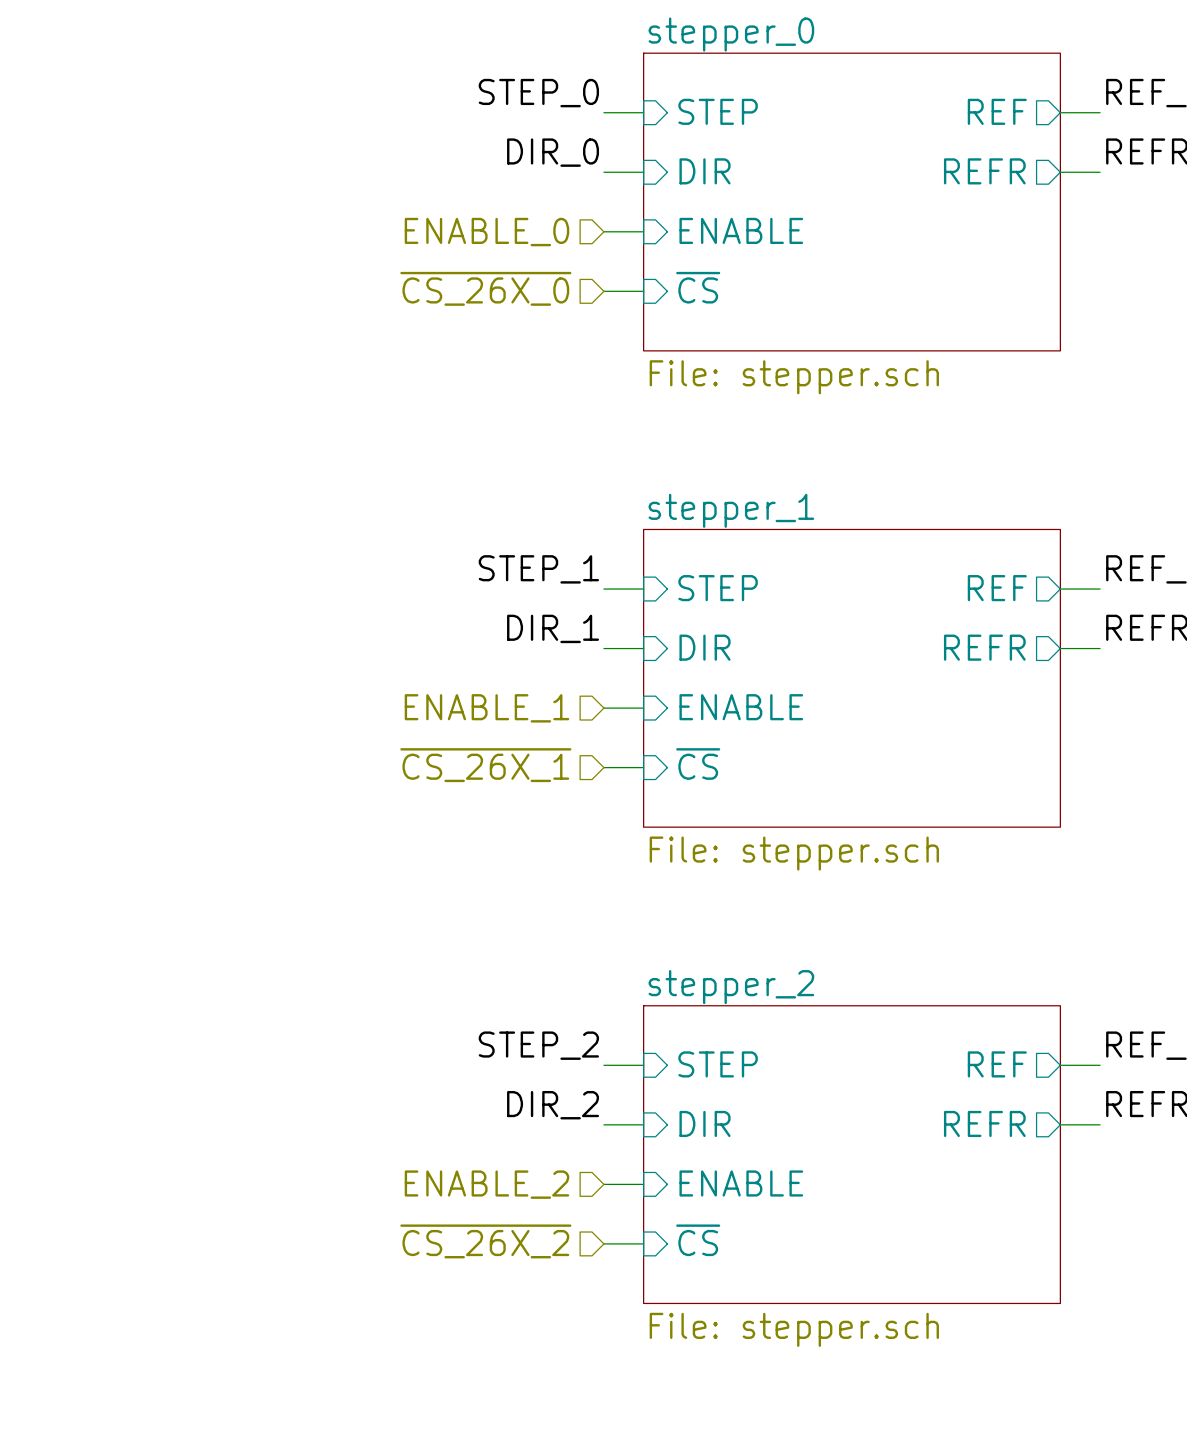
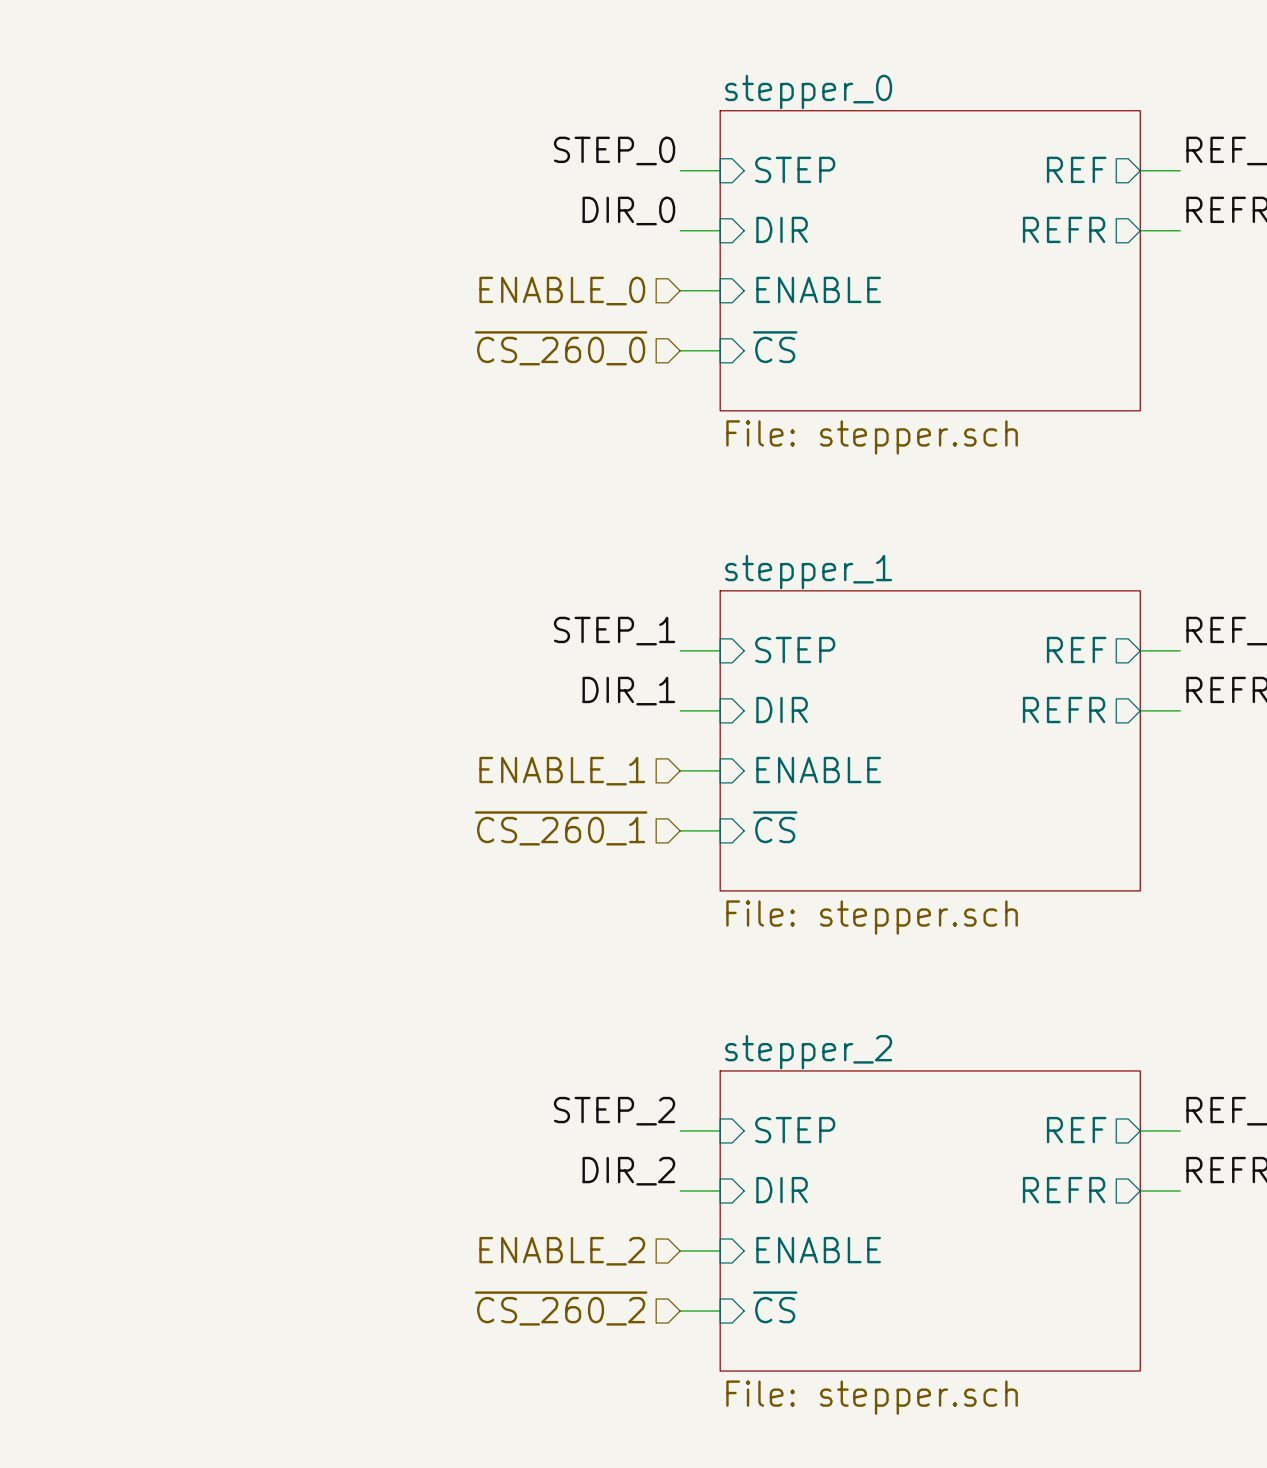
hierarchical label: ~{CS_26X_0} (485, 288) -> ~{CS_260_0} (561, 348)
hierarchical label: ~{CS_26X_1} (485, 765) -> ~{CS_260_1} (561, 828)
hierarchical label: ~{CS_26X_2} (485, 1241) -> ~{CS_260_2} (561, 1308)

